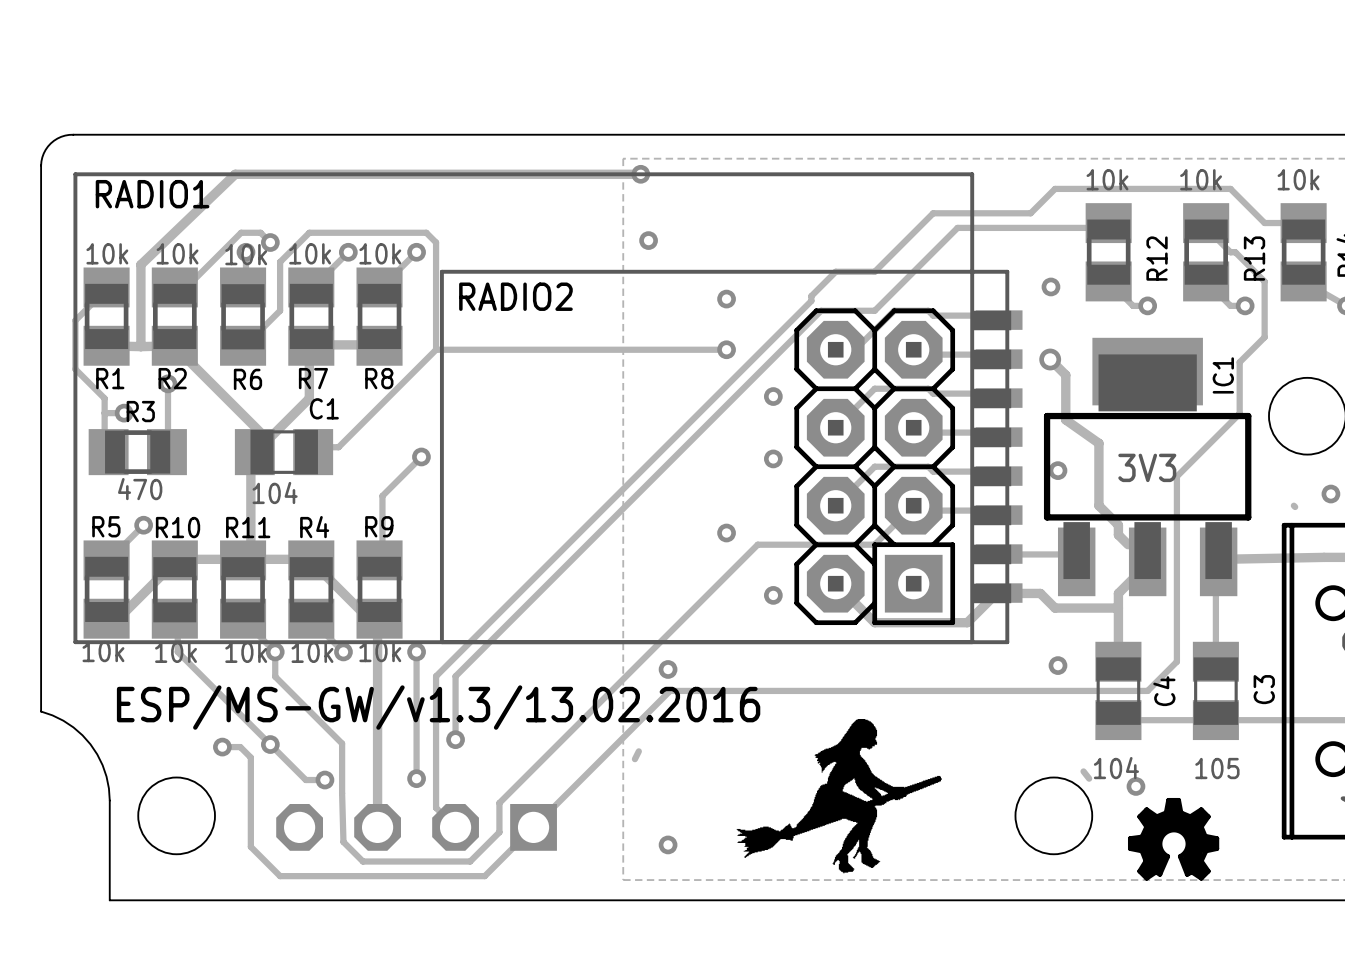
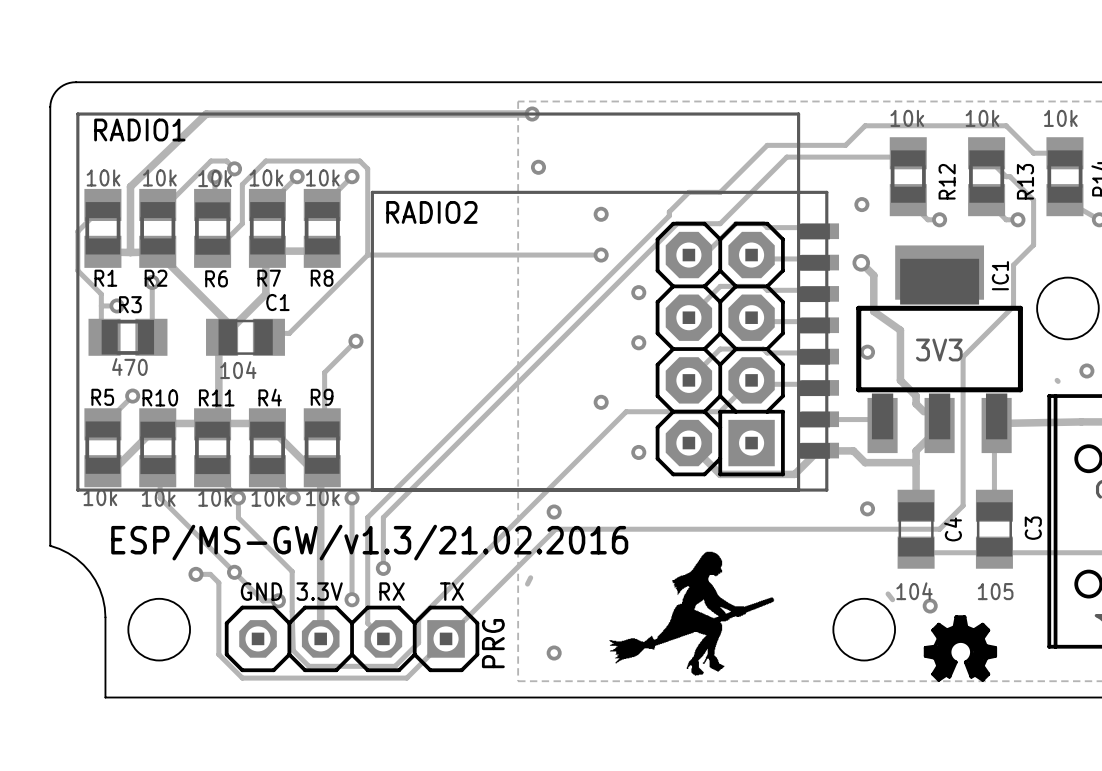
text: ESP/MS-GW/v1.3/13.02.2016 (438, 707) -> ESP/MS-GW/v1.3/21.02.2016 (369, 542)
text: none -> GND (261, 591)
text: none -> 3.3V (319, 591)
text: none -> RX (392, 591)
text: none -> TX (451, 591)
PRG side: top (416, 827) -> bottom (352, 638)

